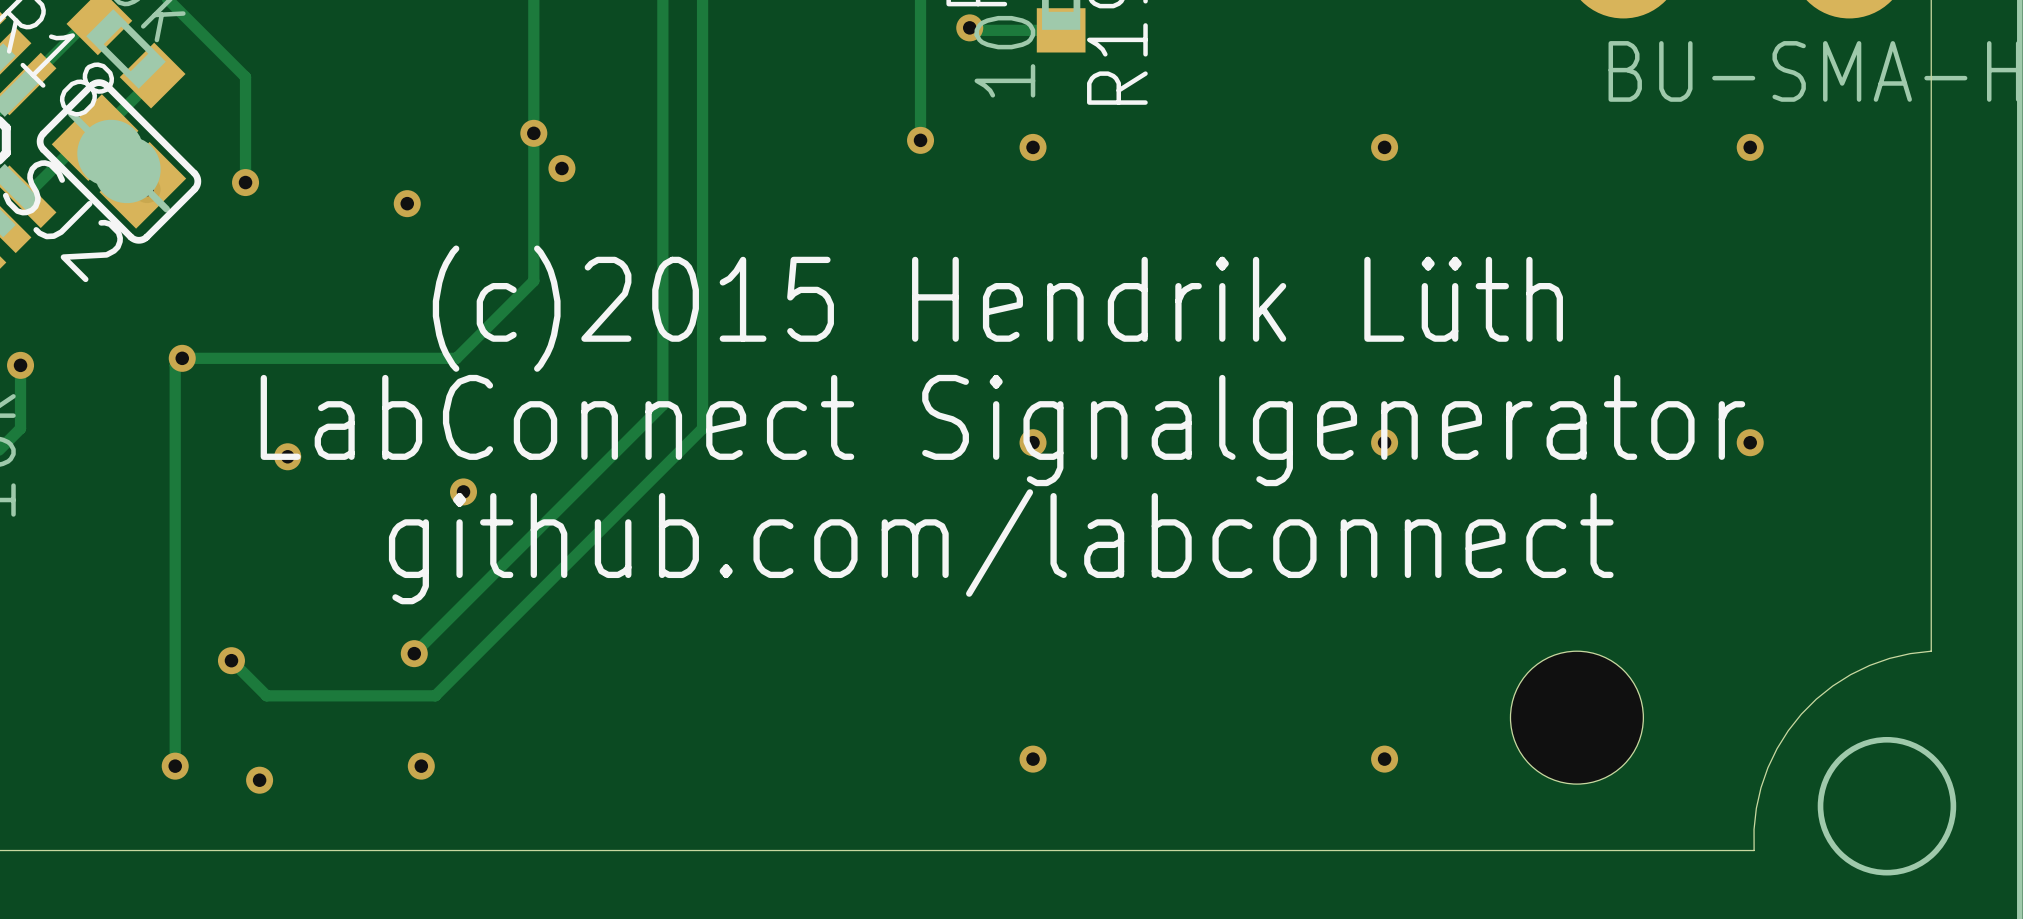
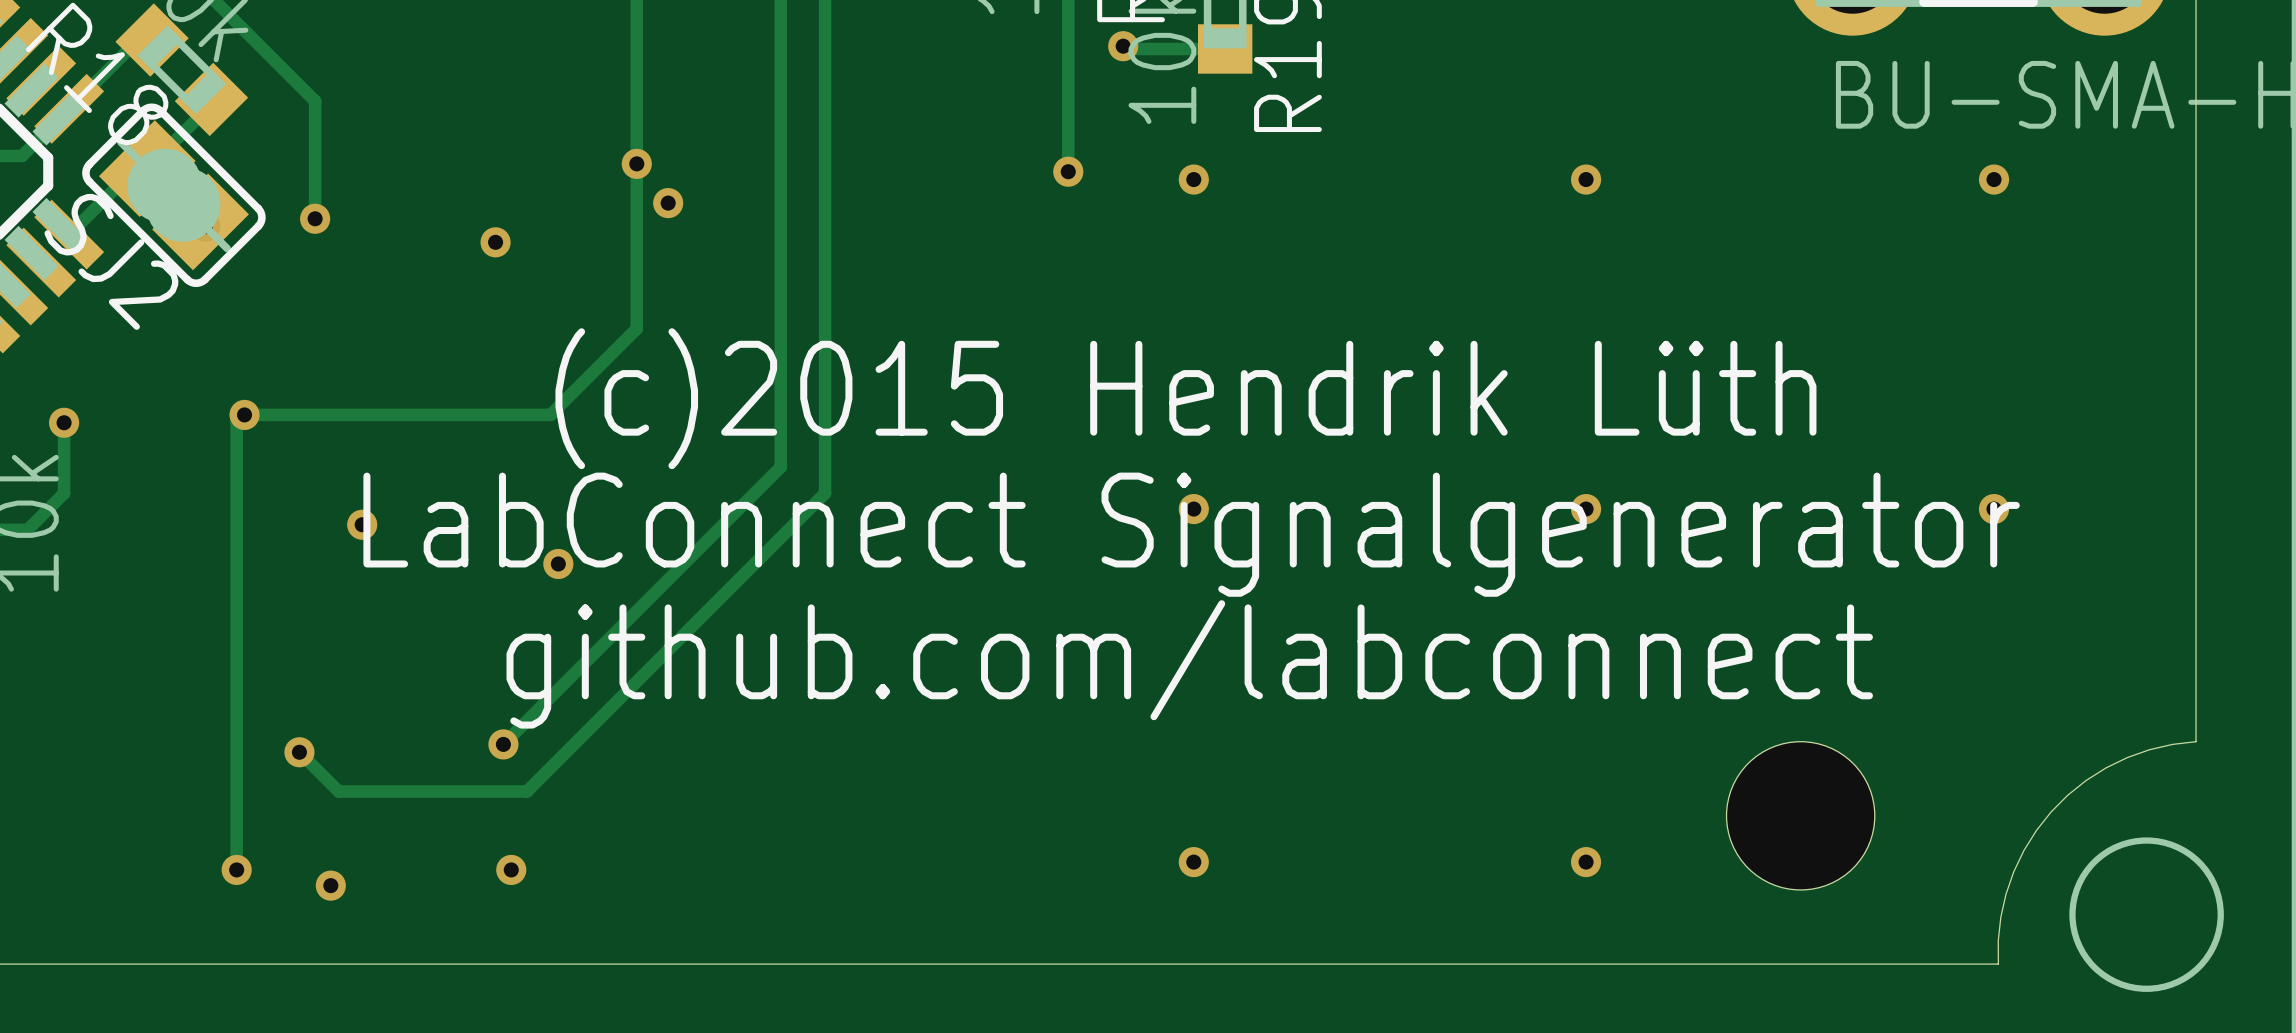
text position: (c)2015 Hendrik Lüth (997, 308) -> (c)2015 Hendrik Lüth (1185, 398)
text position: LabConnect Signalgenerator (1002, 430) -> LabConnect Signalgenerator (1191, 534)
text position: github.com/labconnect (1001, 546) -> github.com/labconnect (1189, 664)

